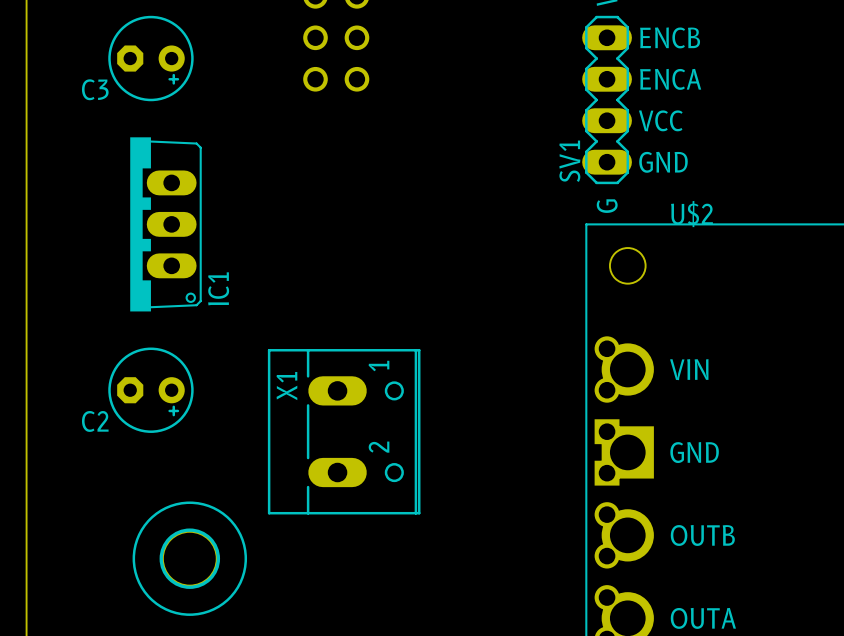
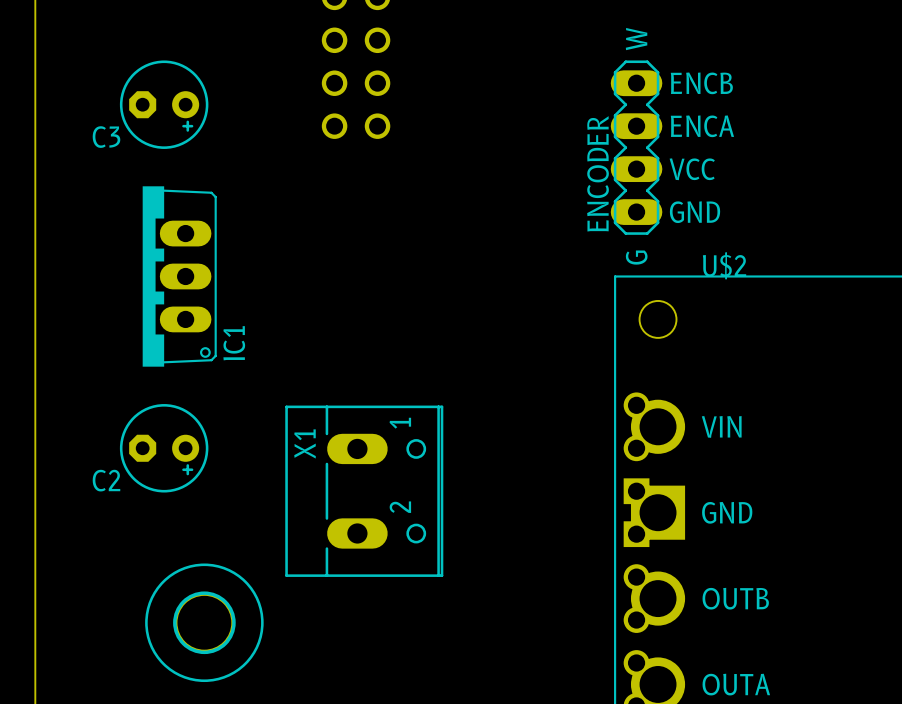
SV1 name: SV1 (569, 161) -> ENCODER (598, 173)

